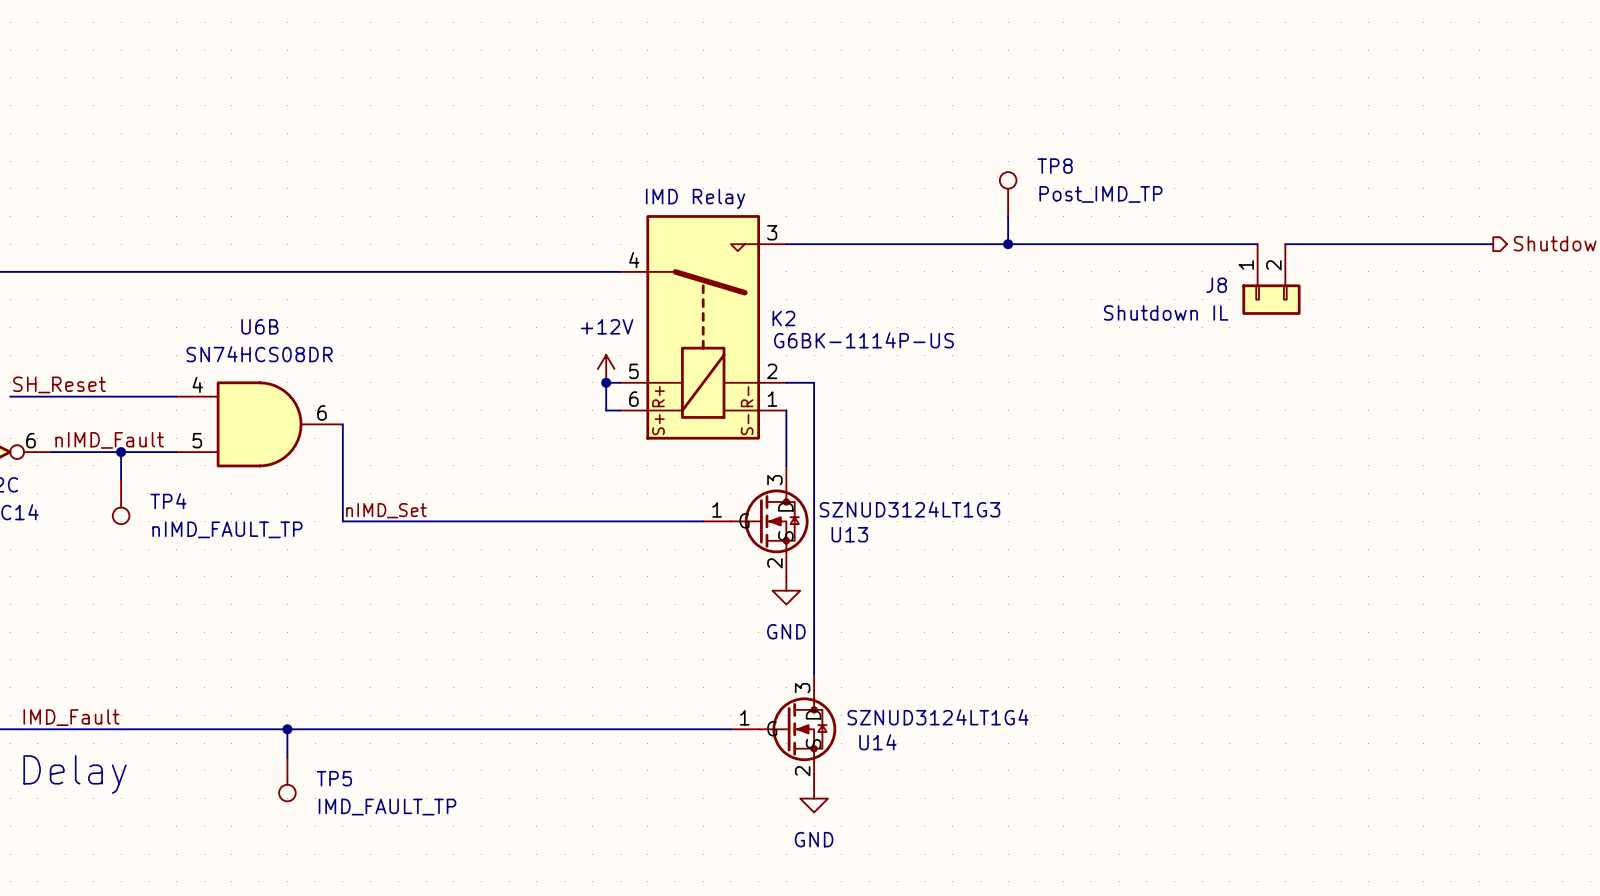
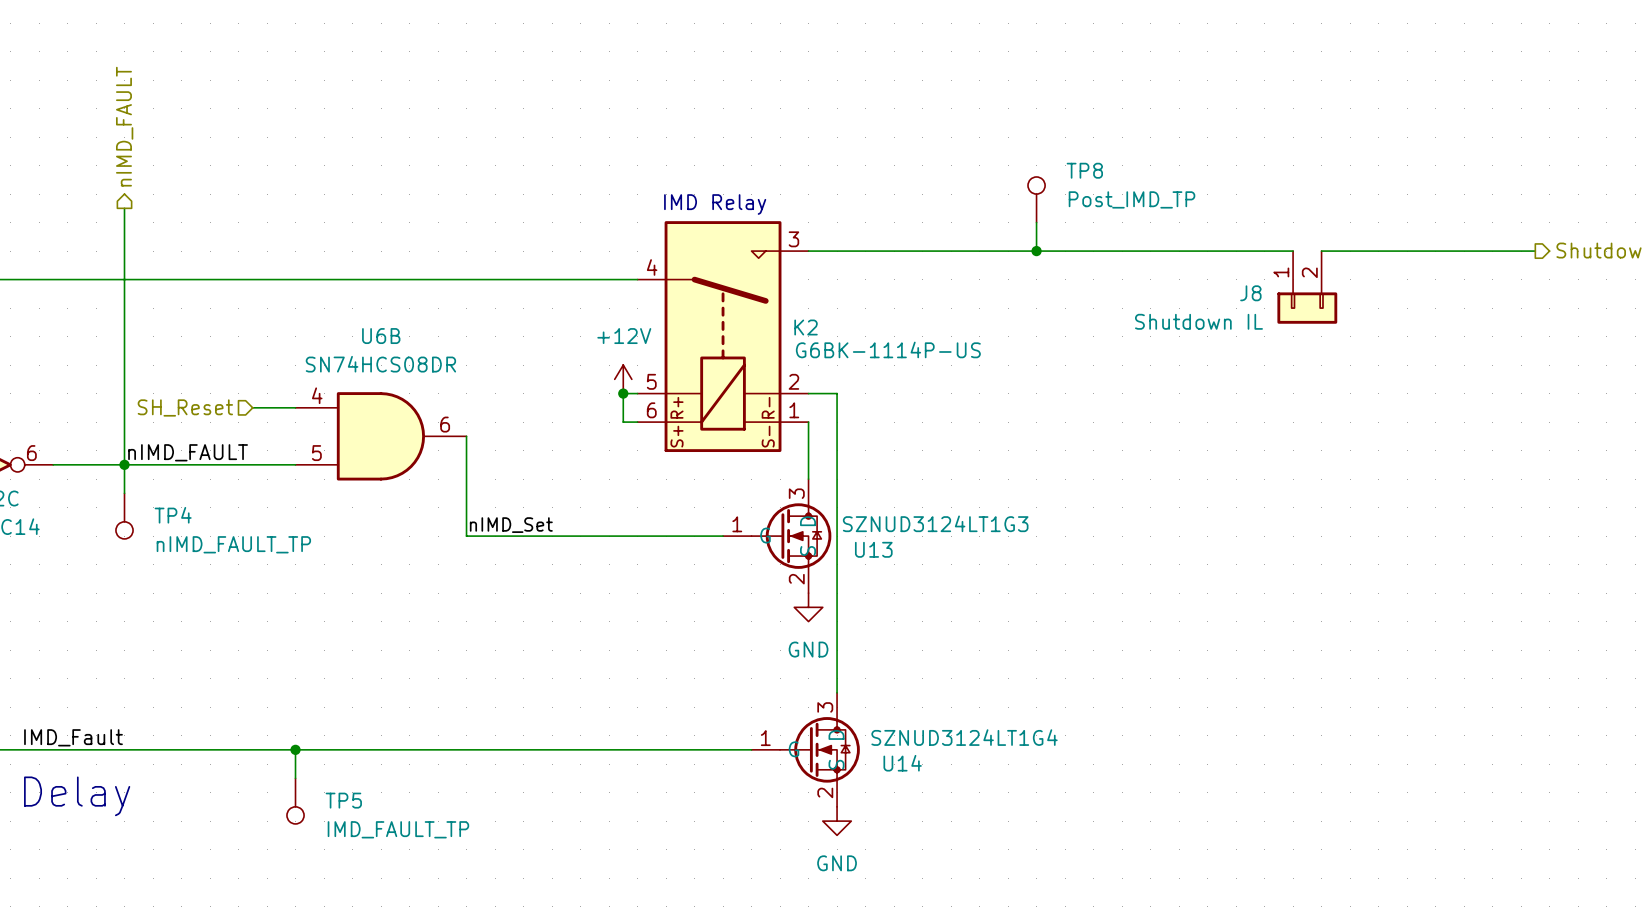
hierarchical label: none -> nIMD_FAULT (124, 126)
wire: none -> (124, 208) (124, 464)
label: SH_Reset (59, 384) -> none
wire: (10, 396) (176, 396) -> none
hierarchical label: none -> SH_Reset (185, 407)
U6B position: (259, 424) -> (381, 436)
wire: (342, 424) (342, 521) (453, 521) -> (466, 436) (466, 536)
label: nIMD_Fault (109, 440) -> none
label: none -> nIMD_FAULT (188, 452)
label position: nIMD_Set (386, 510) -> nIMD_Set (511, 525)

